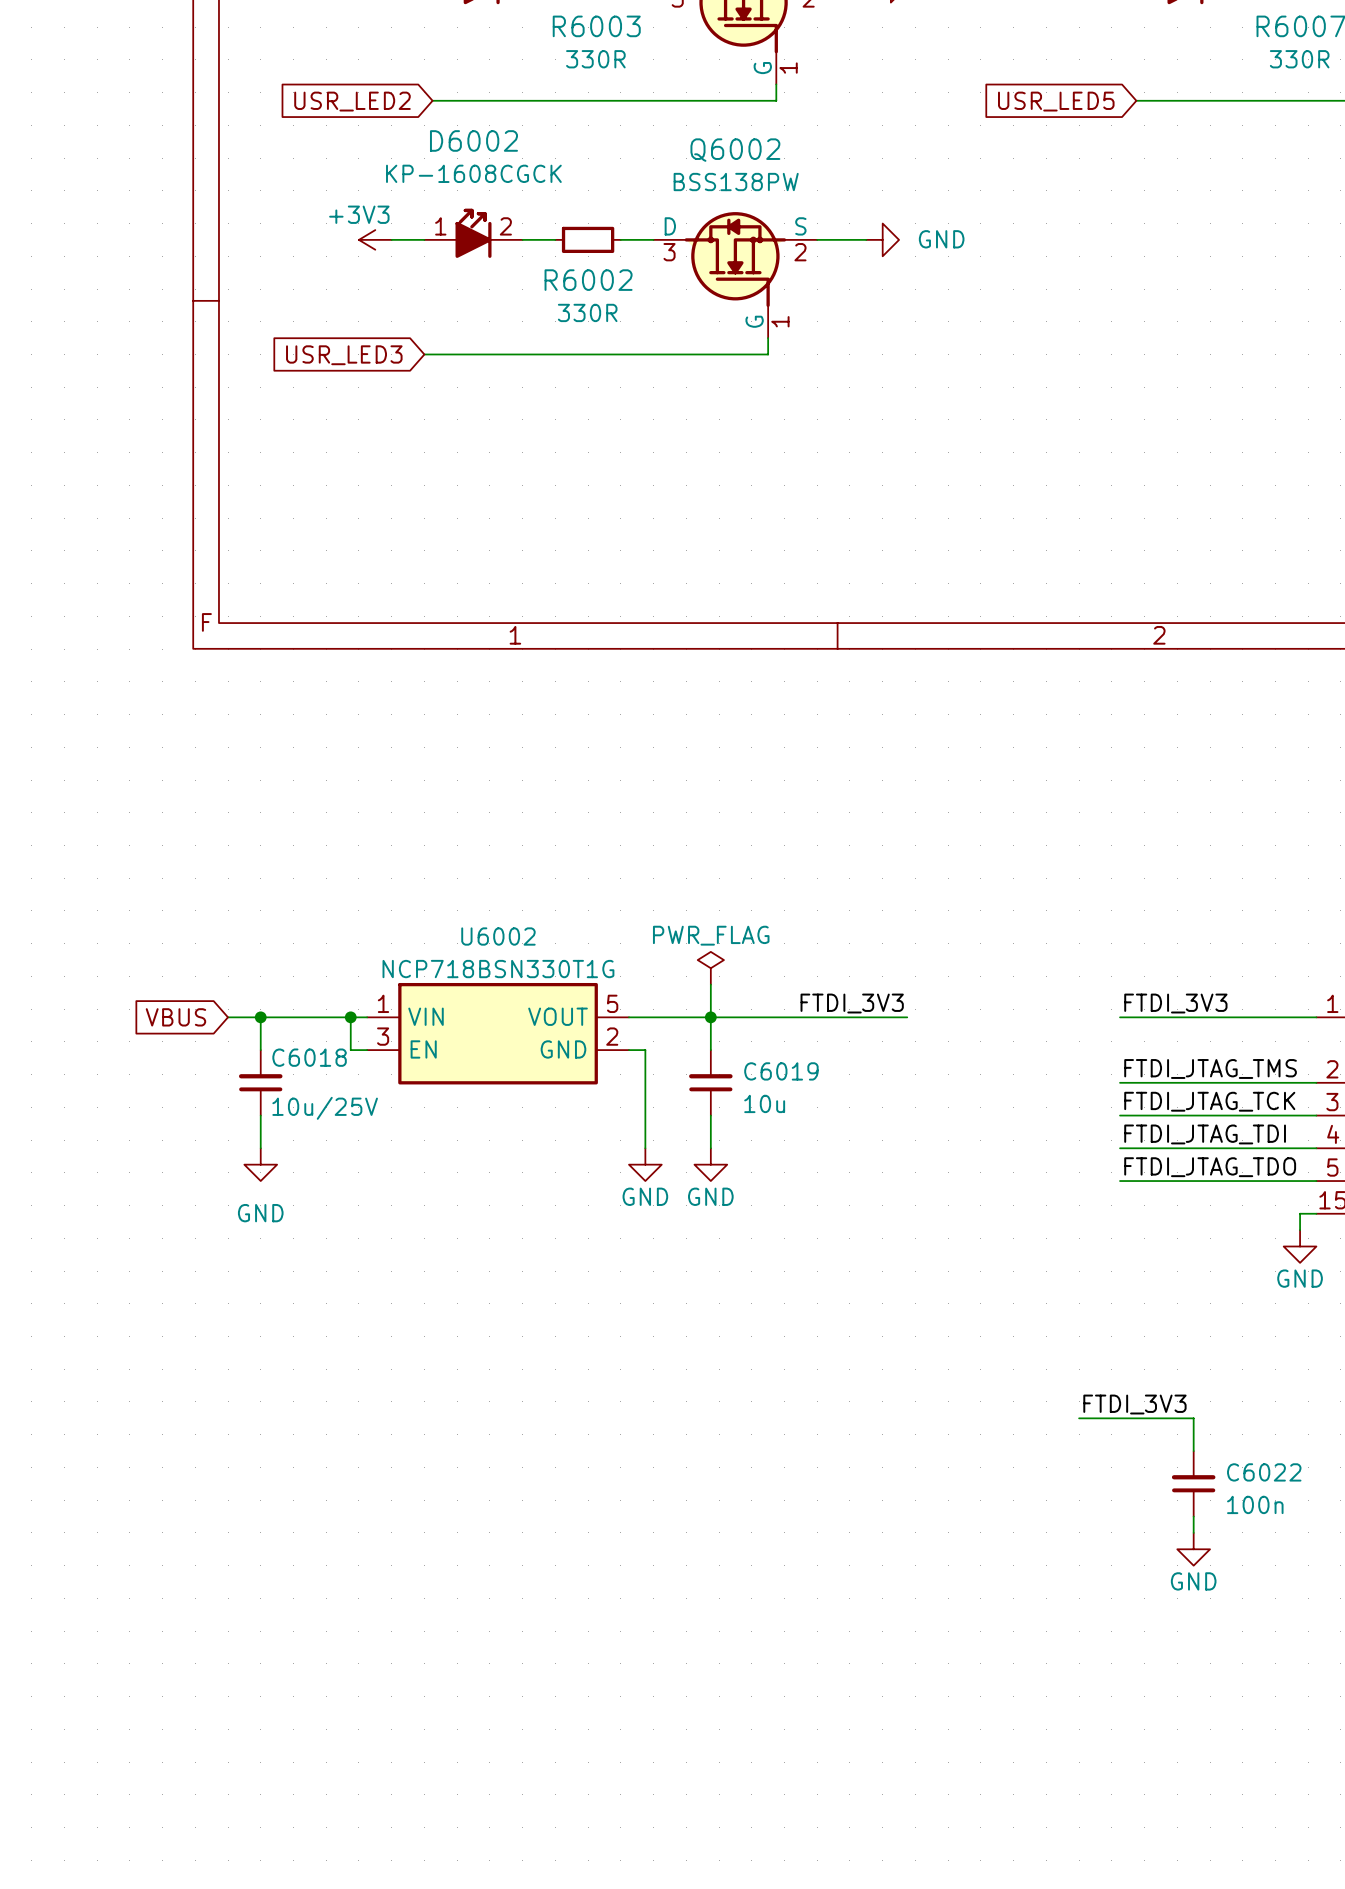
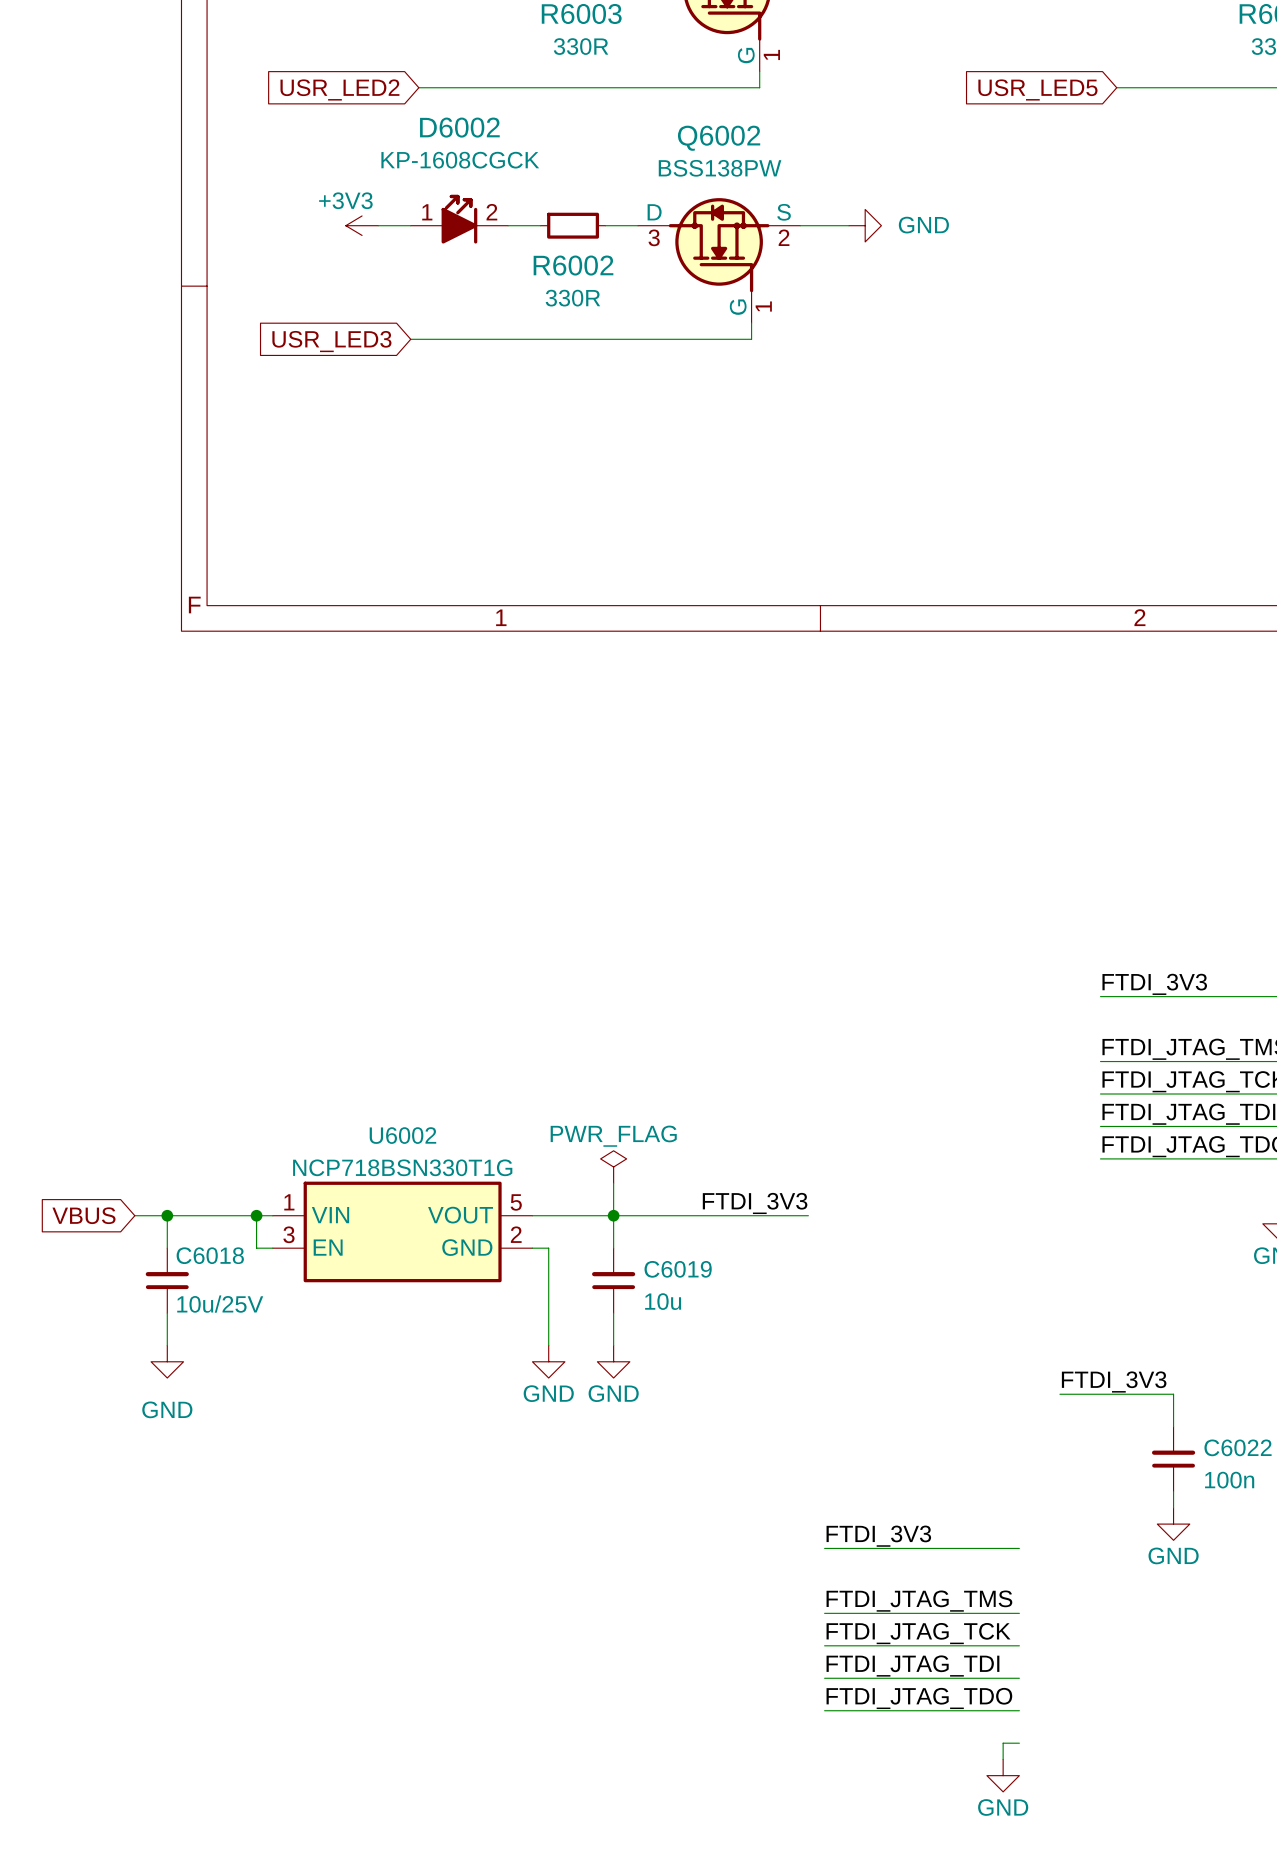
power symbol position: PWR_FLAG (710, 968) -> PWR_FLAG (613, 1167)
wire: (710, 984) (710, 1050) -> (613, 1183) (613, 1248)
label position: FTDI_3V3 (852, 1003) -> FTDI_3V3 (755, 1203)
global label position: VBUS (175, 1017) -> VBUS (83, 1215)
wire: (228, 1017) (367, 1017) -> (134, 1215) (272, 1215)
wire: (260, 1017) (260, 1050) -> (167, 1215) (167, 1248)
junction: (260, 1017) -> none
wire: (350, 1017) (350, 1050) (367, 1050) -> (256, 1215) (256, 1248) (272, 1248)
junction: (350, 1017) -> none
wire: (629, 1017) (907, 1017) -> (532, 1215) (808, 1215)
junction: (710, 1017) -> none
U6002 position: (498, 1033) -> (402, 1231)
wire: (629, 1050) (645, 1050) (645, 1148) -> (532, 1248) (548, 1248) (548, 1345)
C6018 position: (260, 1082) -> (167, 1280)
C6019 position: (710, 1082) -> (613, 1280)
wire: (260, 1115) (260, 1148) -> (167, 1313) (167, 1345)
wire: (710, 1115) (710, 1148) -> (613, 1313) (613, 1345)
power symbol: GND (260, 1164) -> none
power symbol: GND (645, 1164) -> none
power symbol: GND (710, 1164) -> none
junction: none -> (167, 1215)
junction: none -> (256, 1215)
junction: none -> (613, 1215)
power symbol: none -> GND (167, 1361)
power symbol: none -> GND (548, 1361)
power symbol: none -> GND (613, 1361)
label: none -> FTDI_3V3 (878, 1536)
wire: none -> (824, 1548) (1019, 1548)
label: none -> FTDI_JTAG_TMS (919, 1601)
wire: none -> (824, 1613) (1019, 1613)
label: none -> FTDI_JTAG_TCK (918, 1633)
wire: none -> (824, 1645) (1019, 1645)
label: none -> FTDI_JTAG_TDI (912, 1666)
wire: none -> (824, 1678) (1019, 1678)
label: none -> FTDI_JTAG_TDO (919, 1698)
wire: none -> (824, 1710) (1019, 1710)
wire: none -> (1019, 1743) (1003, 1743) (1003, 1759)
power symbol: none -> GND (1003, 1775)

